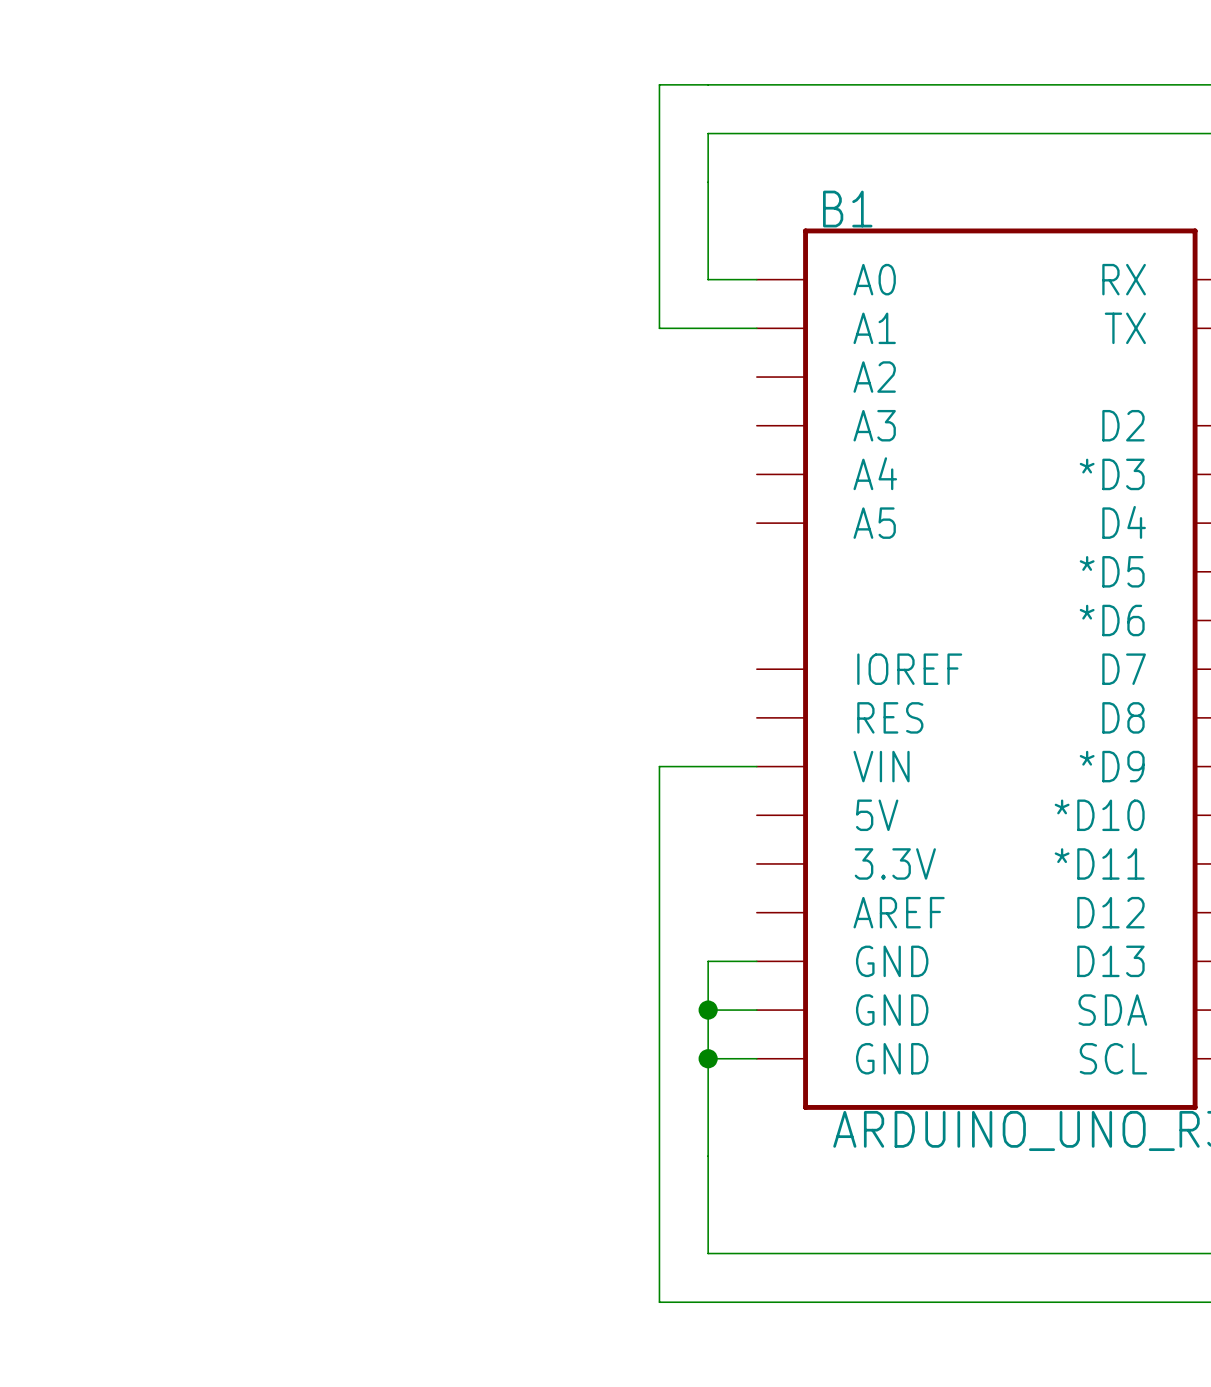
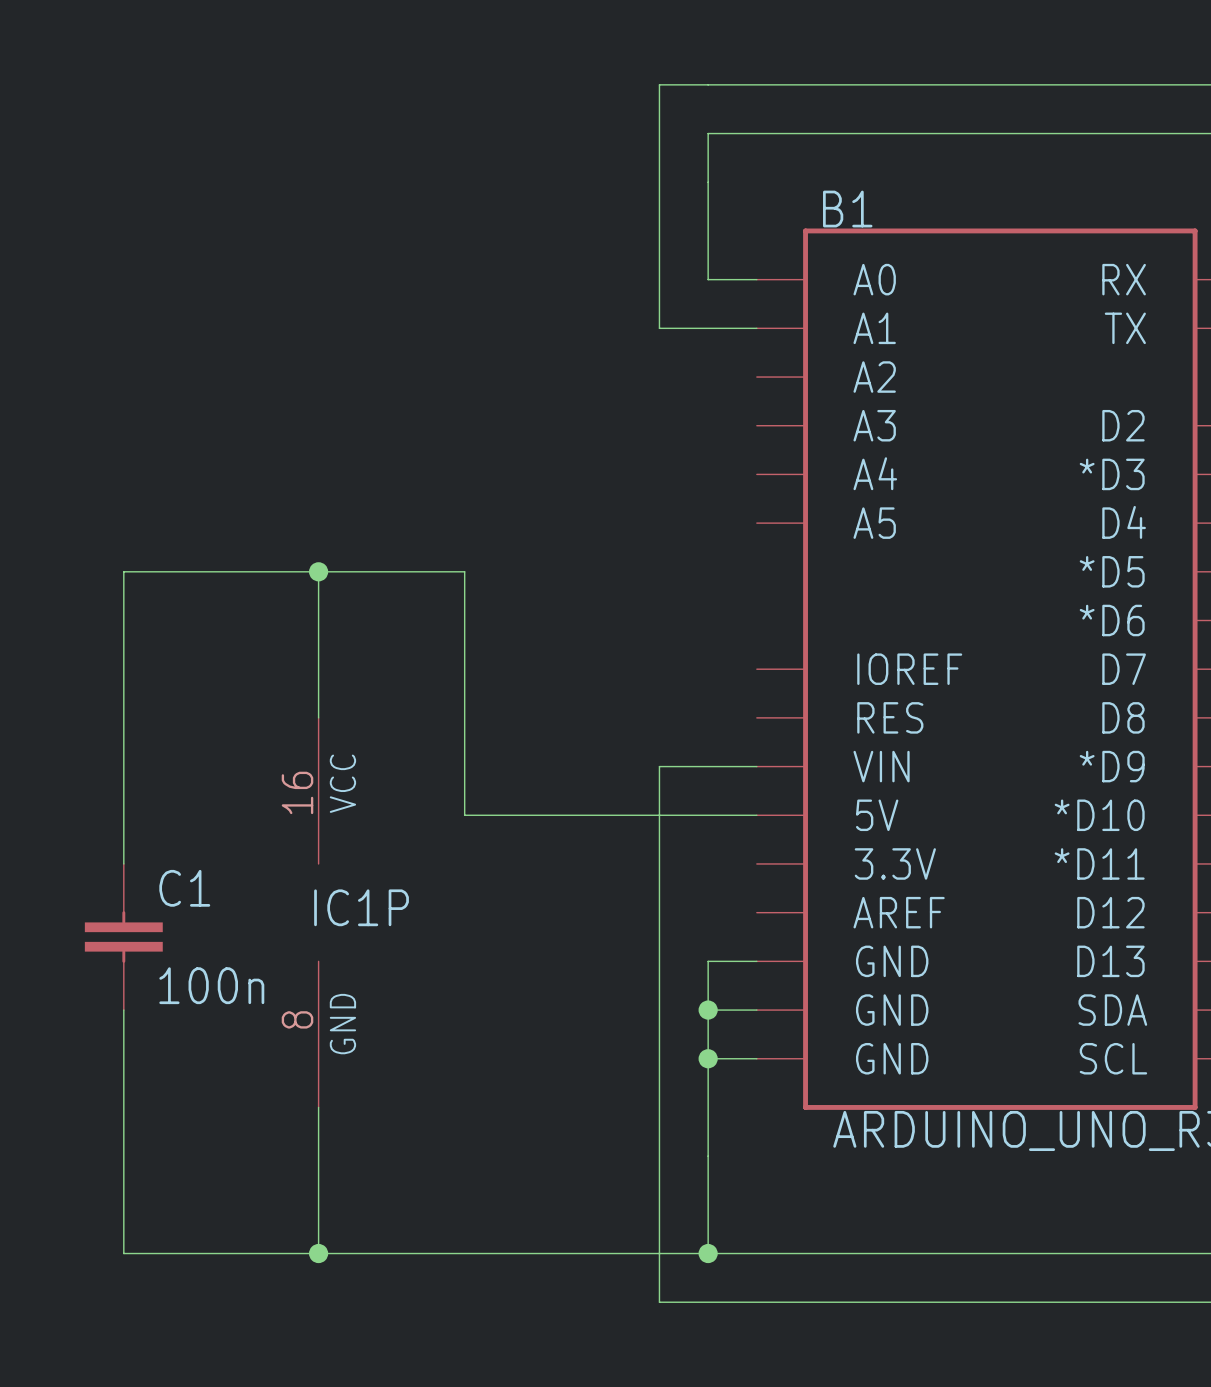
wire: none -> (318, 571) (318, 717)
junction: none -> (318, 571)
wire: none -> (756, 815) (464, 815) (464, 571) (123, 571) (123, 863)
IC1P: none -> (318, 912)
C1: none -> 100n (123, 937)
wire: none -> (123, 1010) (123, 1253) (708, 1253)
wire: none -> (318, 1107) (318, 1253)
junction: none -> (318, 1253)
junction: none -> (708, 1253)

